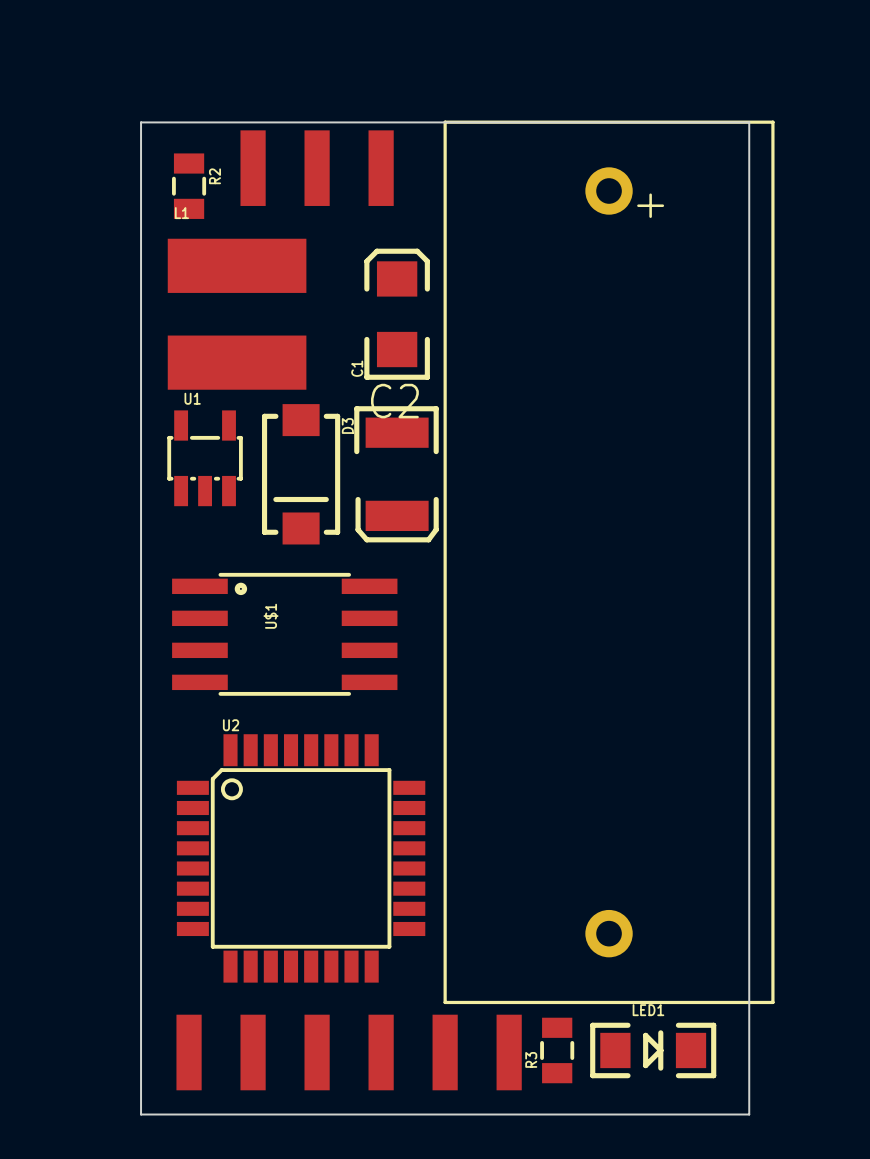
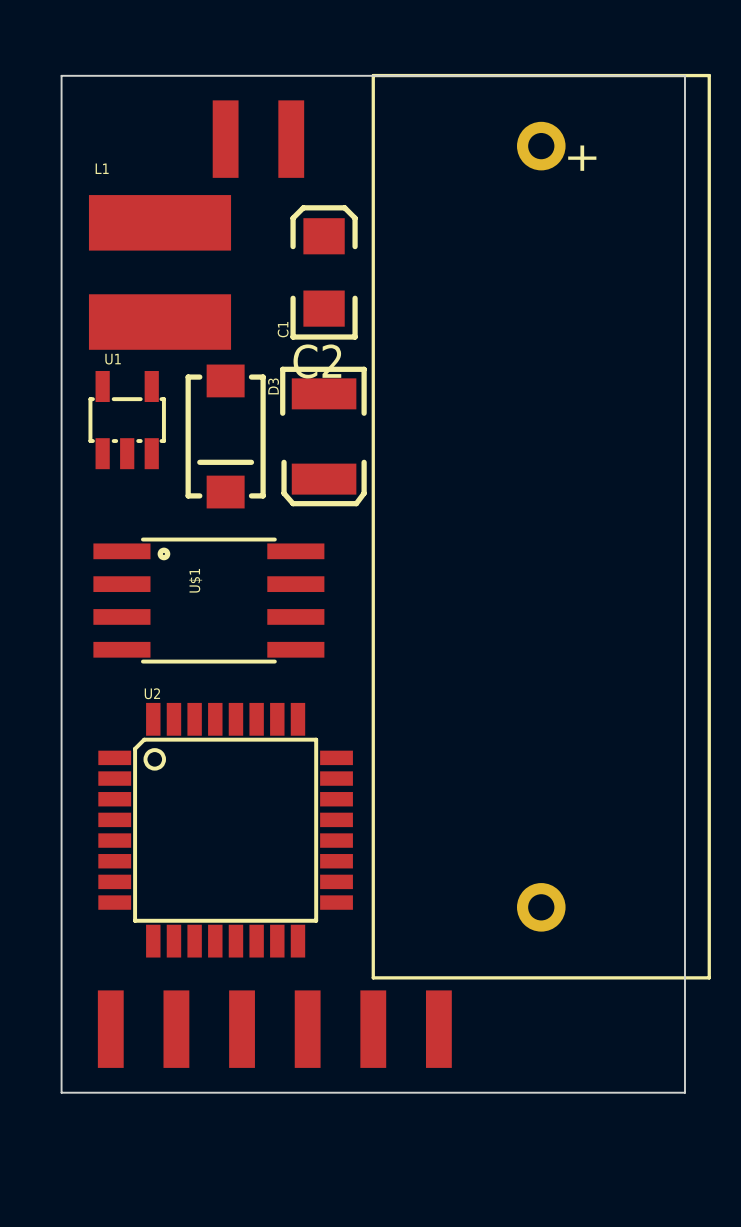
part footprint: [240, 130, 394, 206] -> [212, 100, 305, 178]
R2: (189, 186) -> none
R3: (557, 1050) -> none
LED1: (653, 1050) -> none

